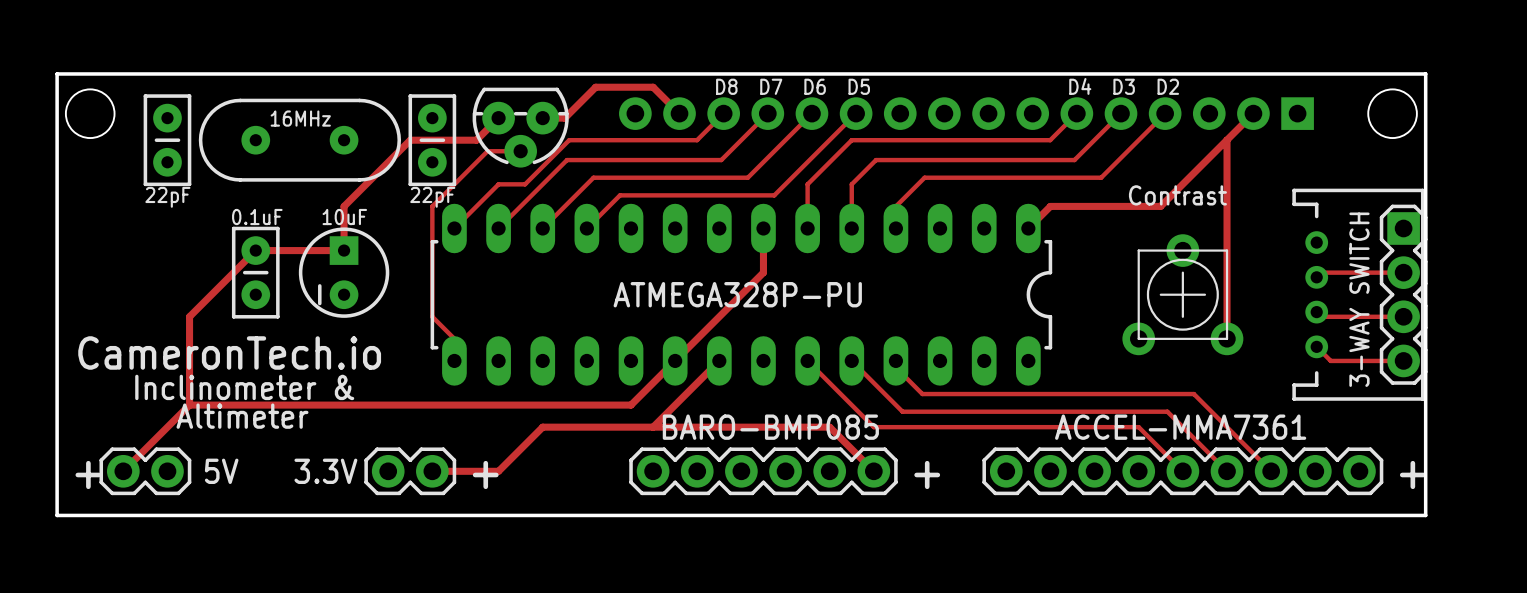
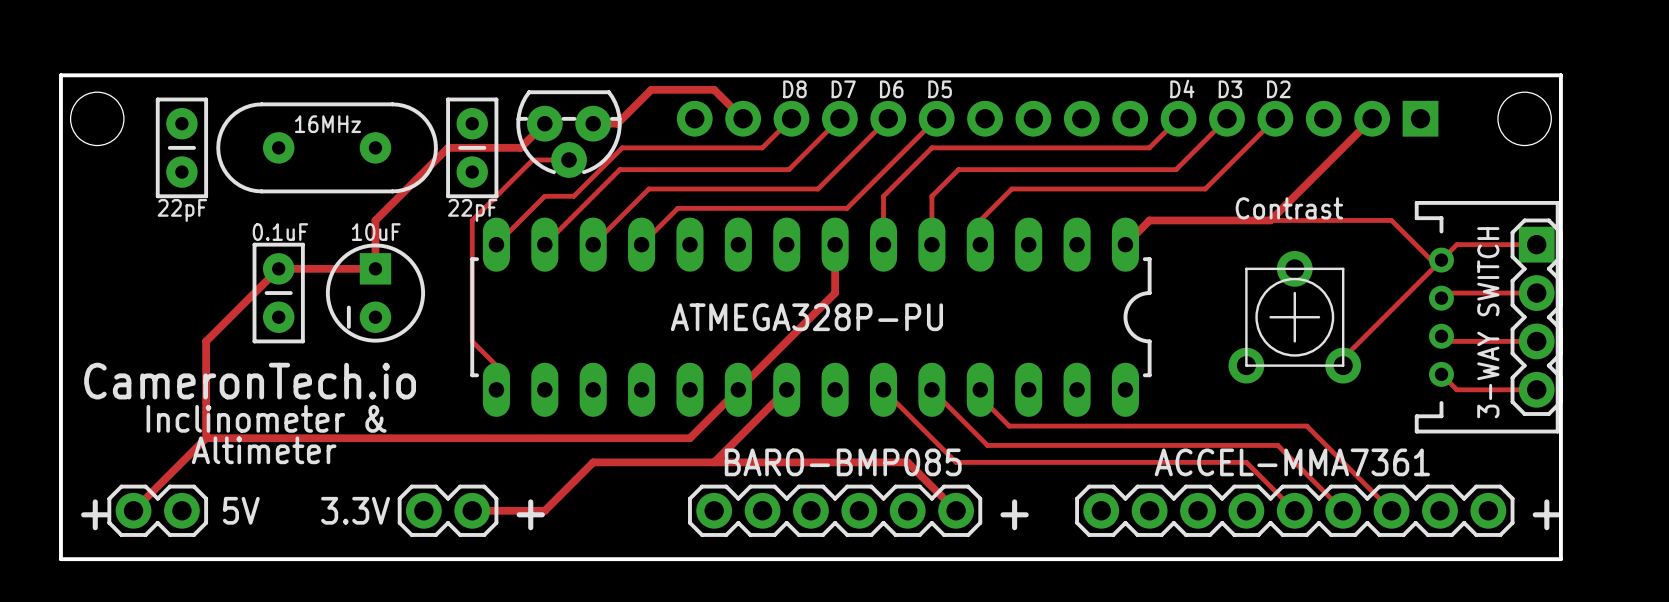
track: (1227, 140) (1227, 332) -> (1536, 244) (1456, 244) (1343, 358)
track: none -> (1270, 220) (1391, 220) (1431, 260) (1441, 260)

